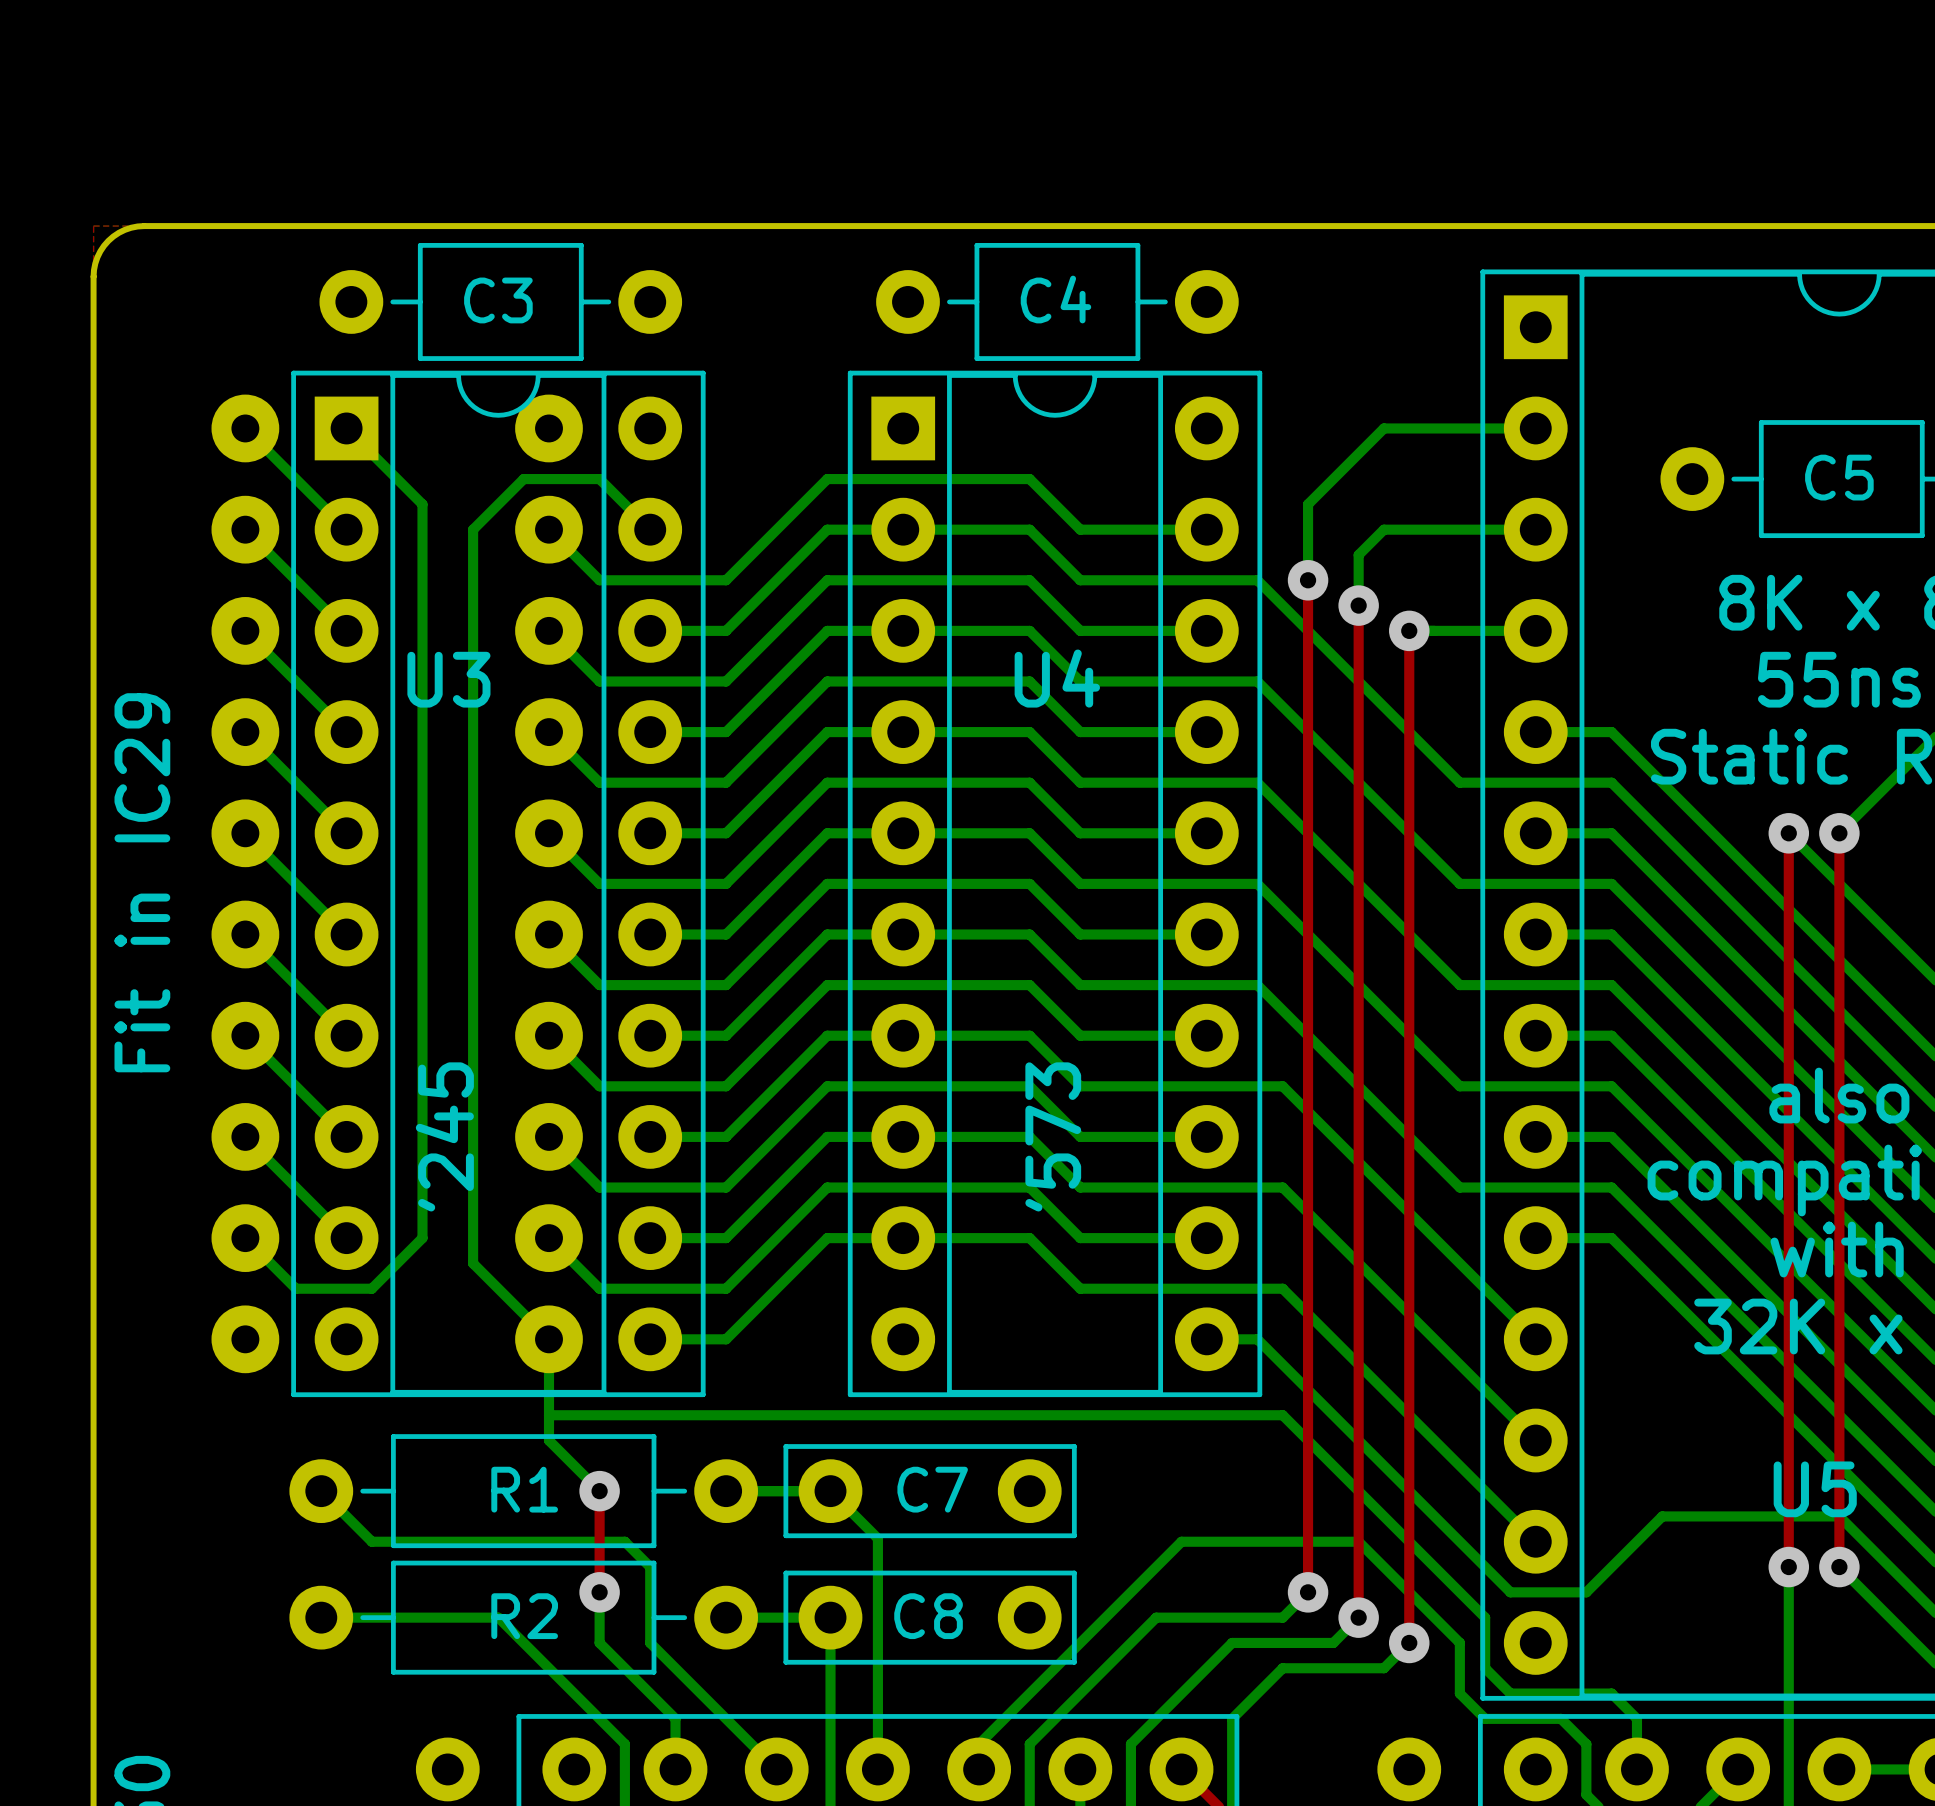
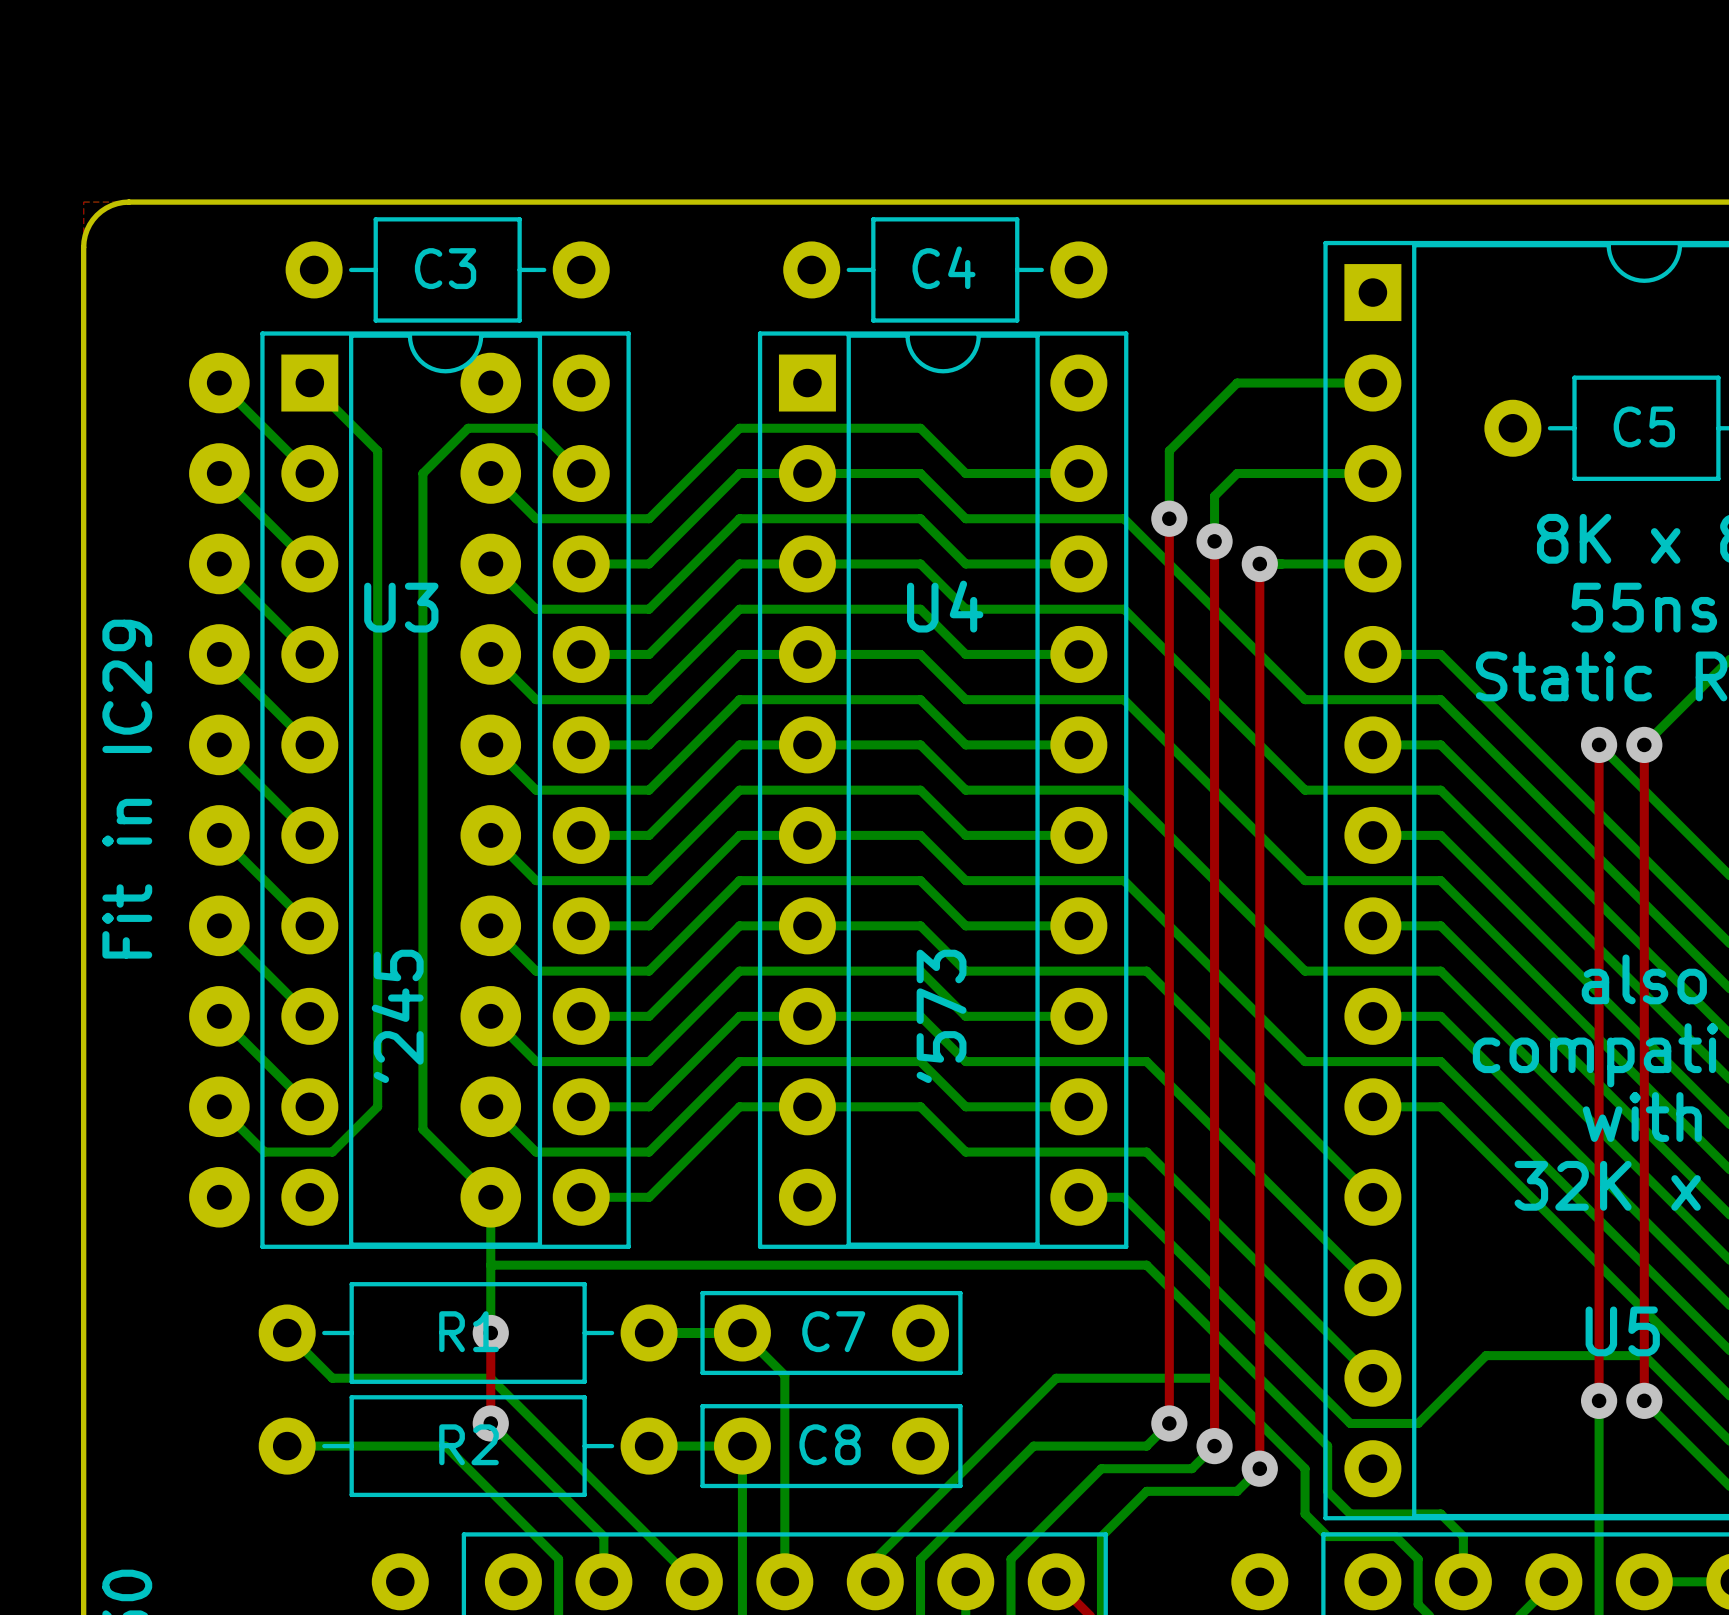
bottom track: (549, 1440) (599, 1491) -> (490, 1287) (490, 1333)
top track: (599, 1491) (599, 1592) -> (490, 1333) (490, 1423)
via position: (599, 1491) -> (490, 1333)
bottom track: (549, 1541) (624, 1541) (650, 1567) (650, 1642) -> (490, 1378) (581, 1468)
bottom track: (599, 1592) (599, 1642) -> (490, 1423) (536, 1468)
via position: (599, 1592) -> (490, 1423)

